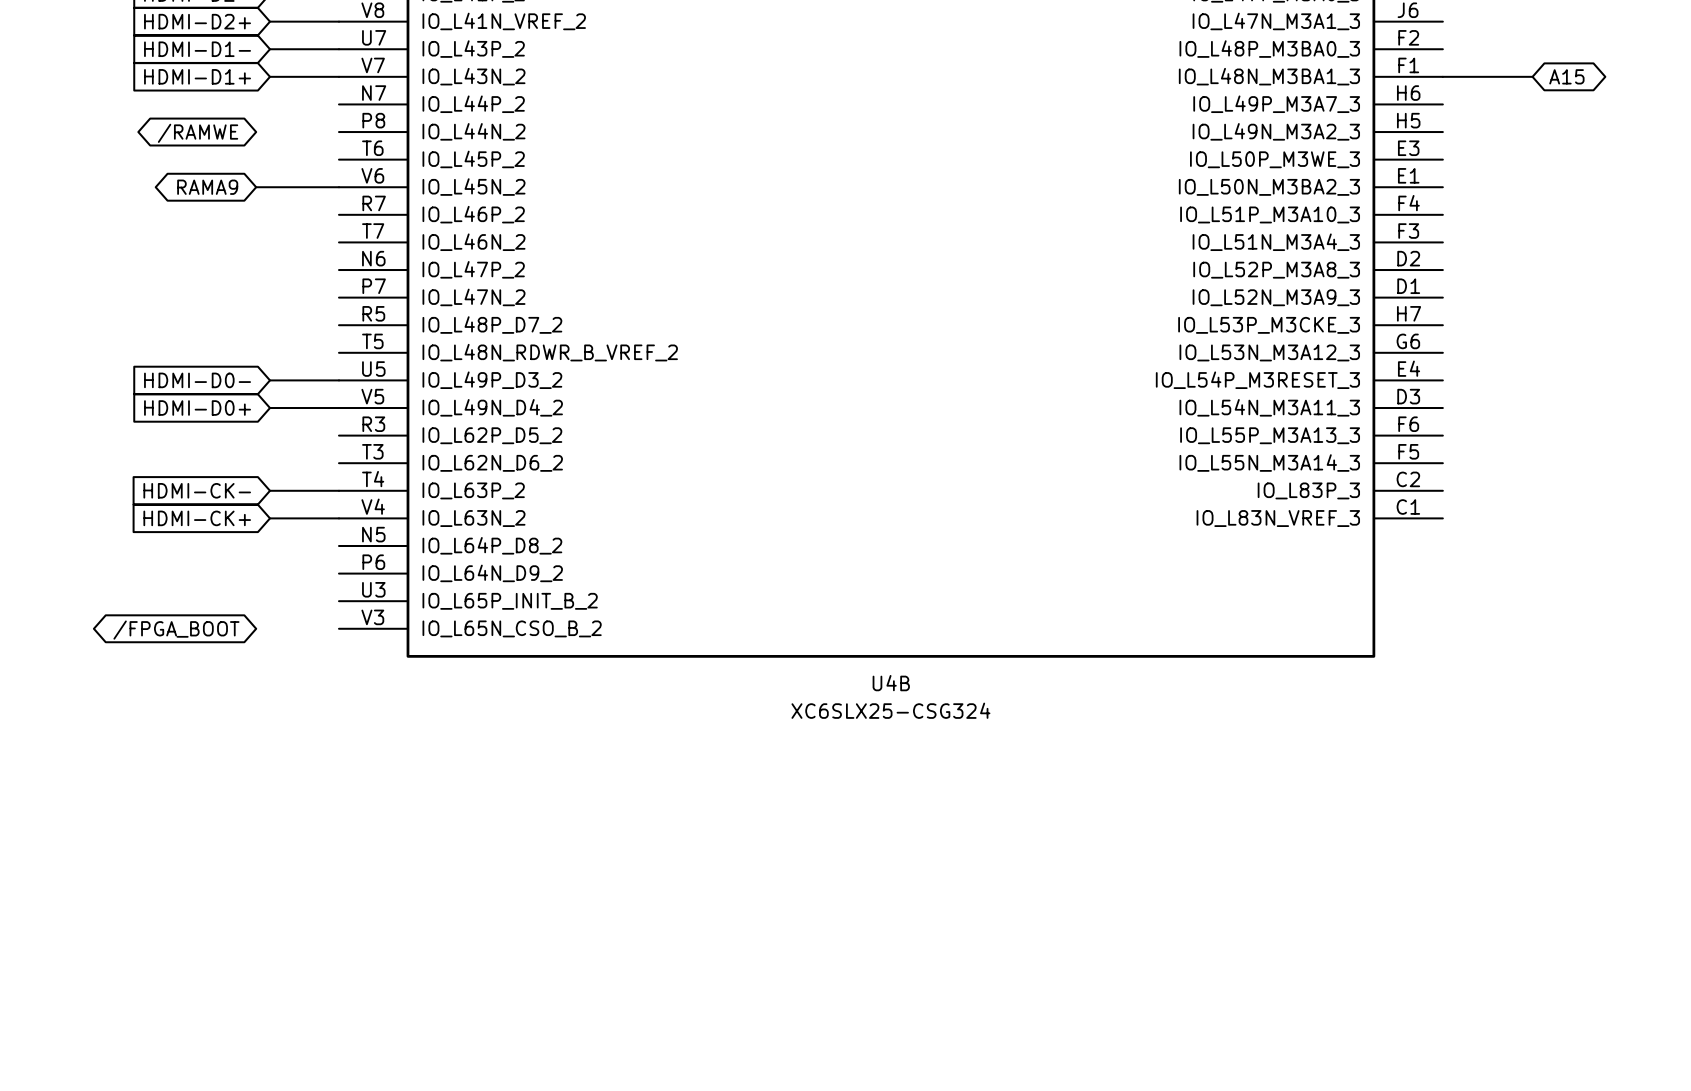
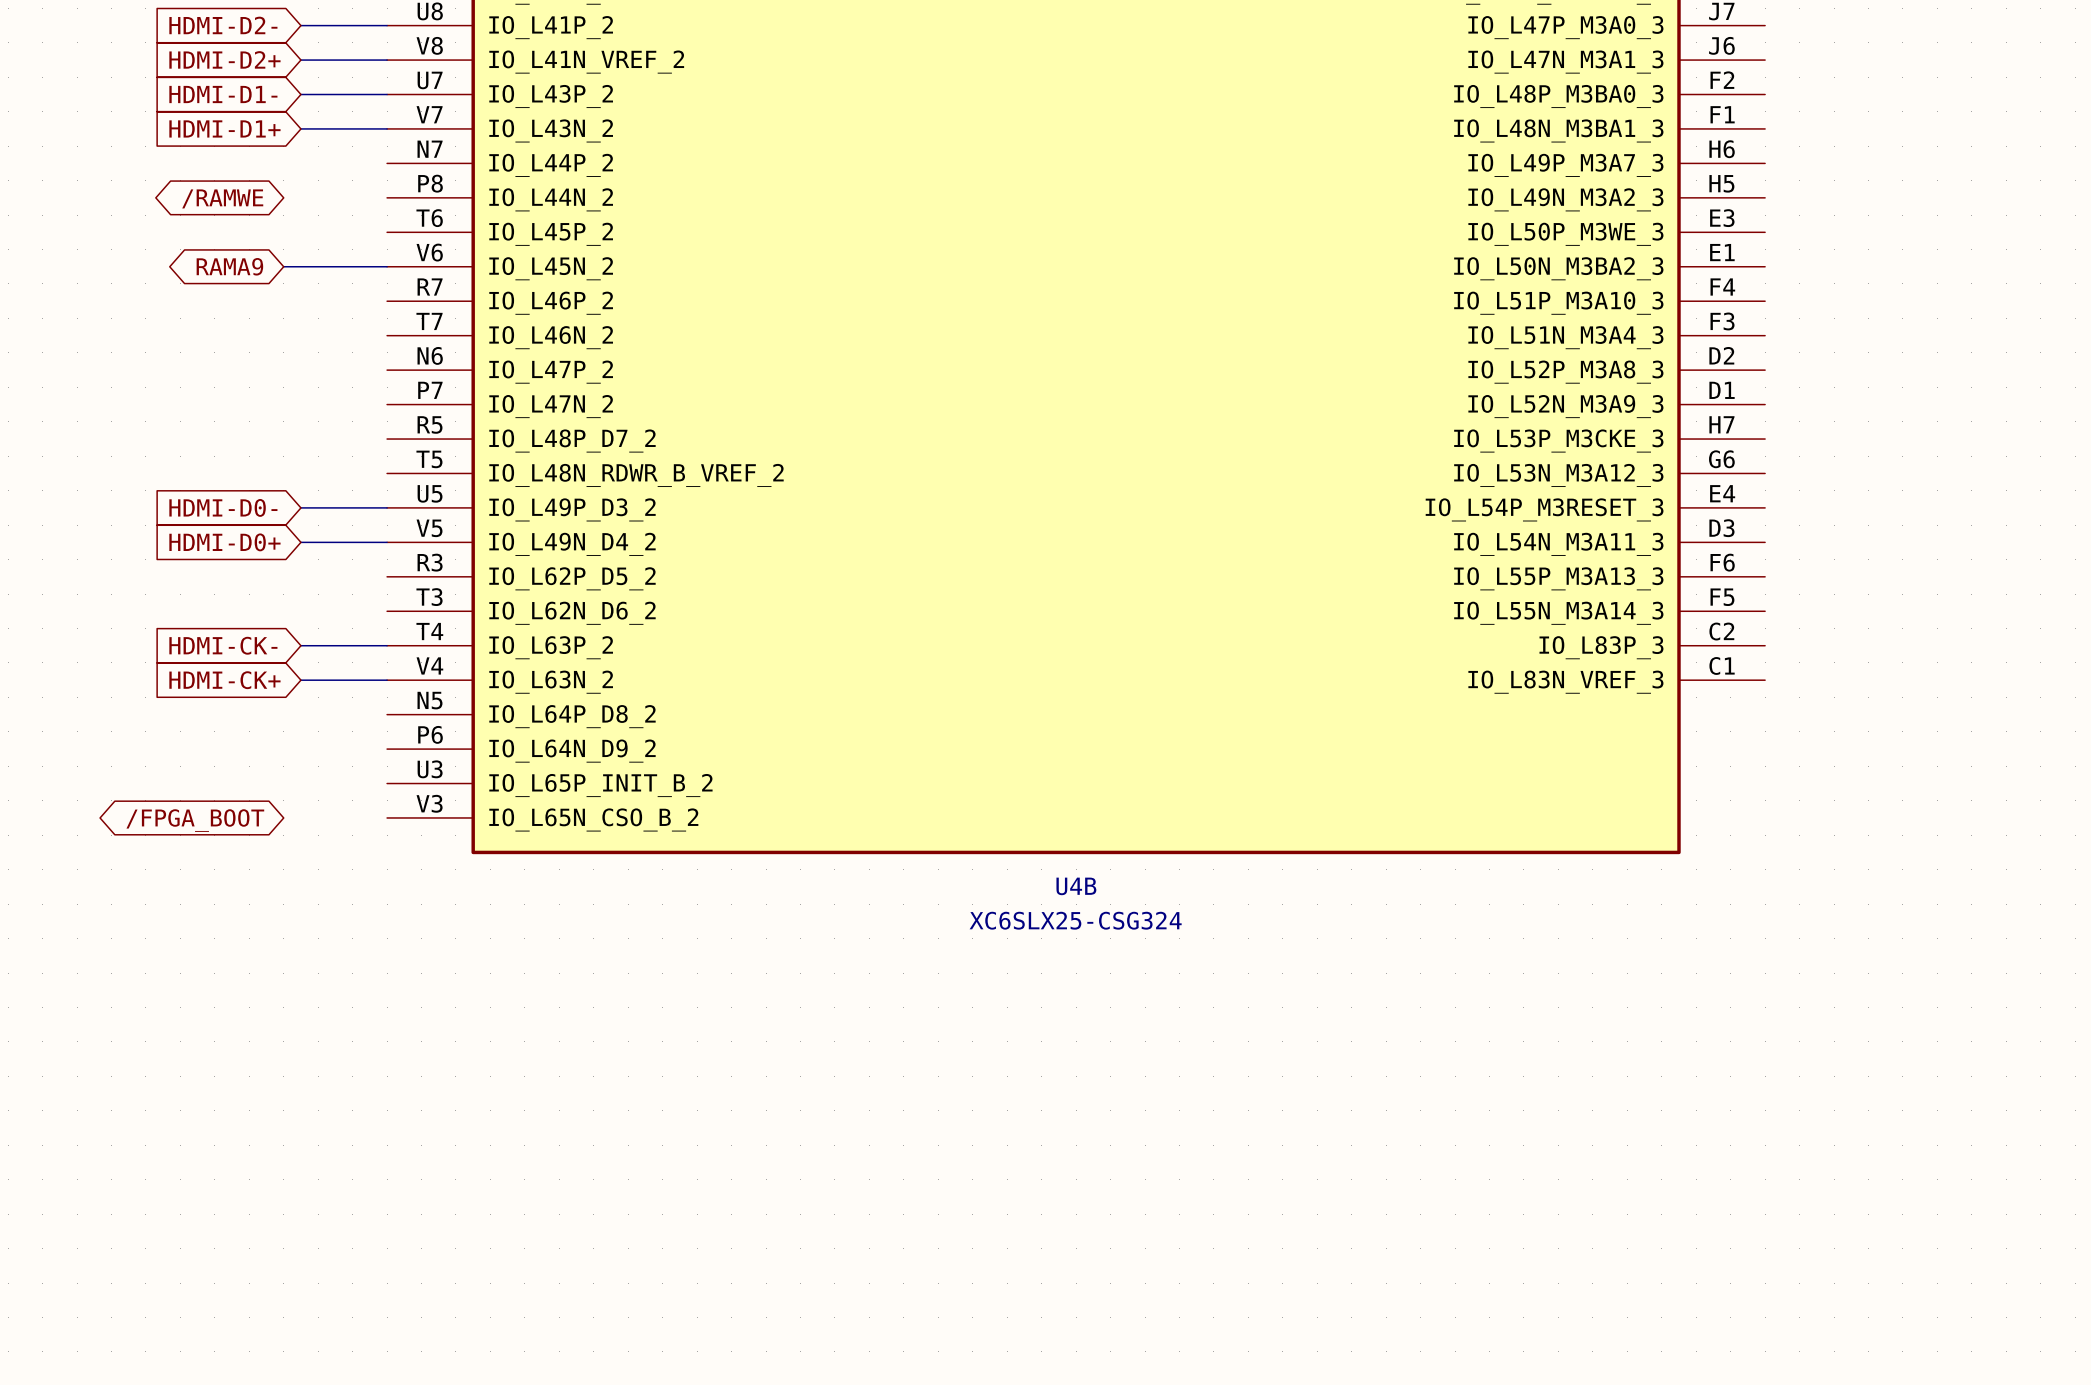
wire: (1442, 76) (1532, 76) -> none
global label: A15 (1566, 76) -> none

